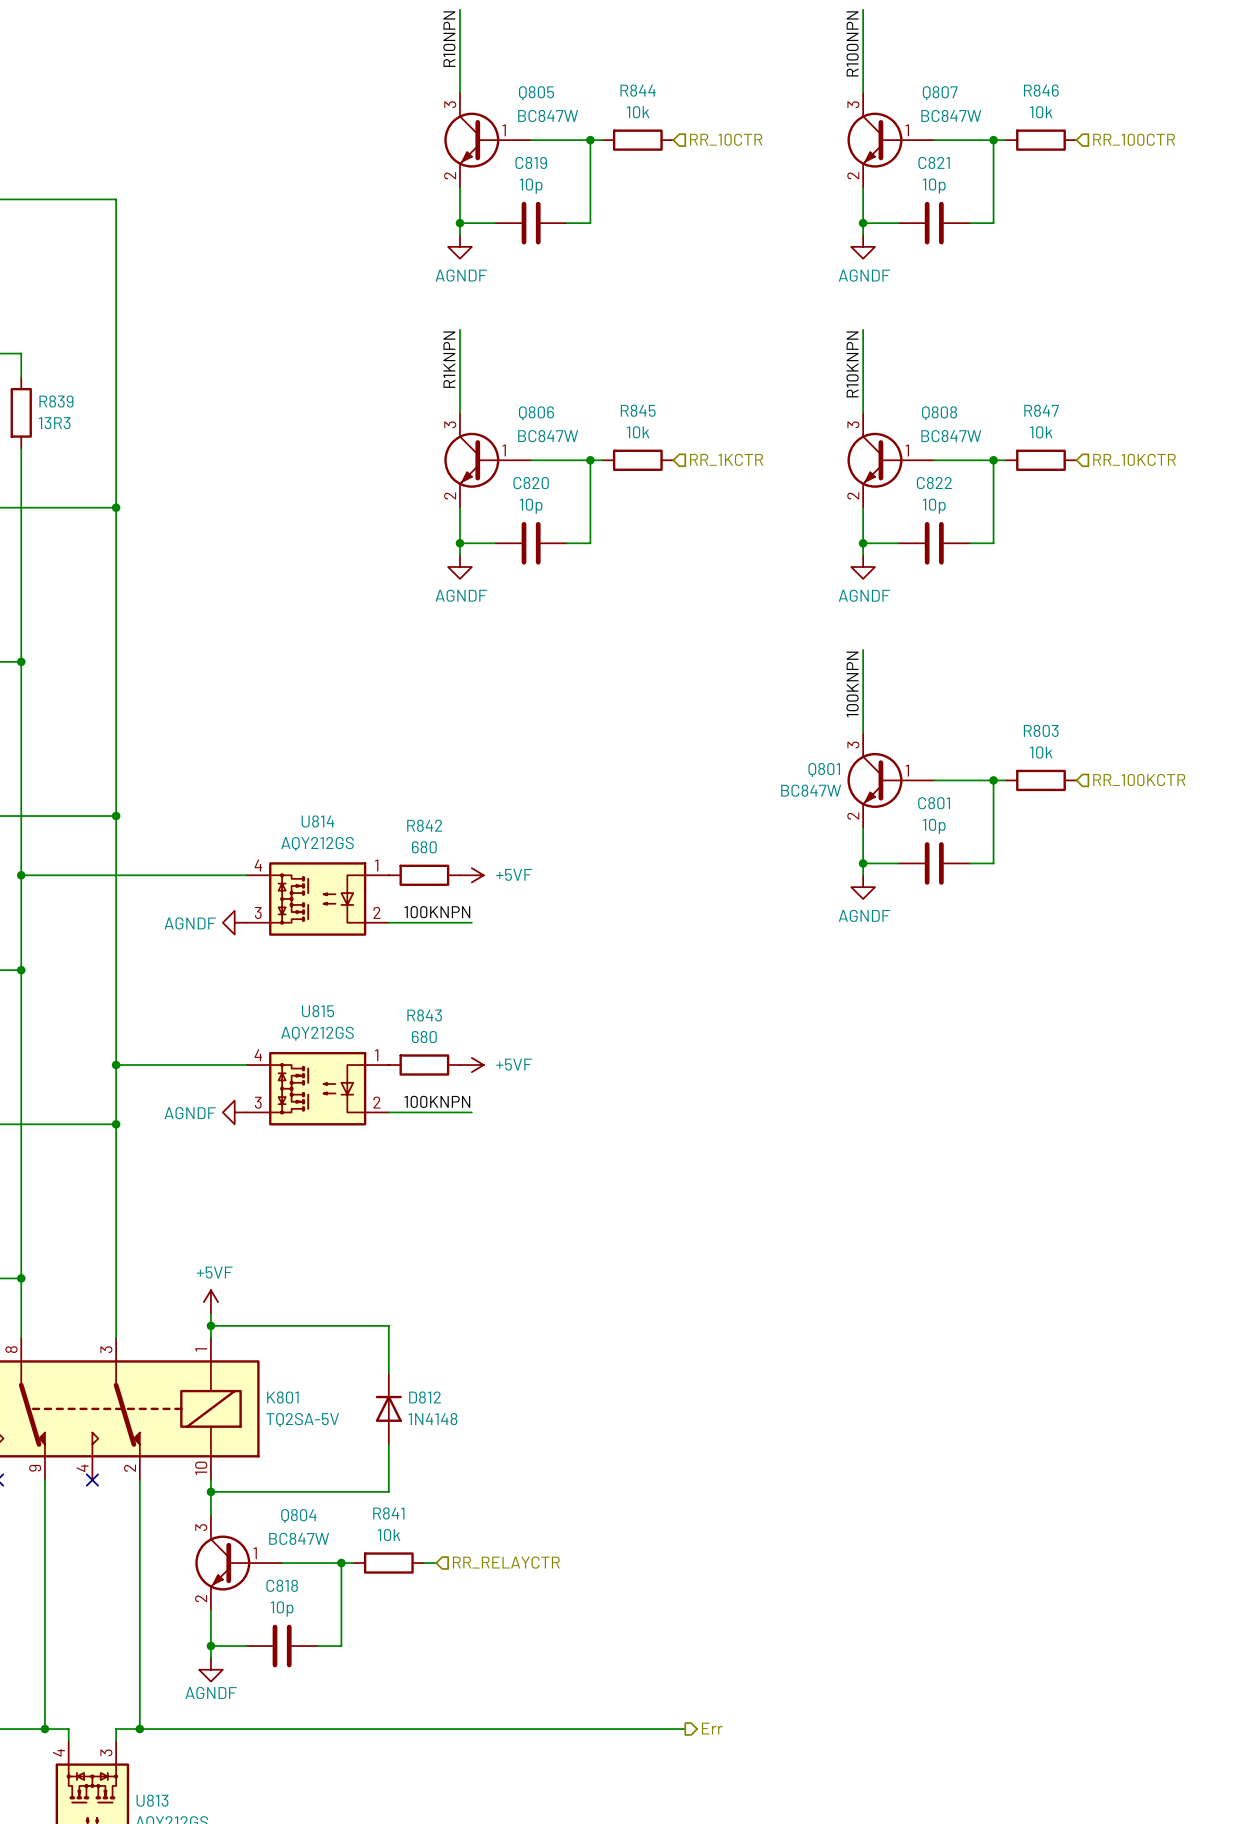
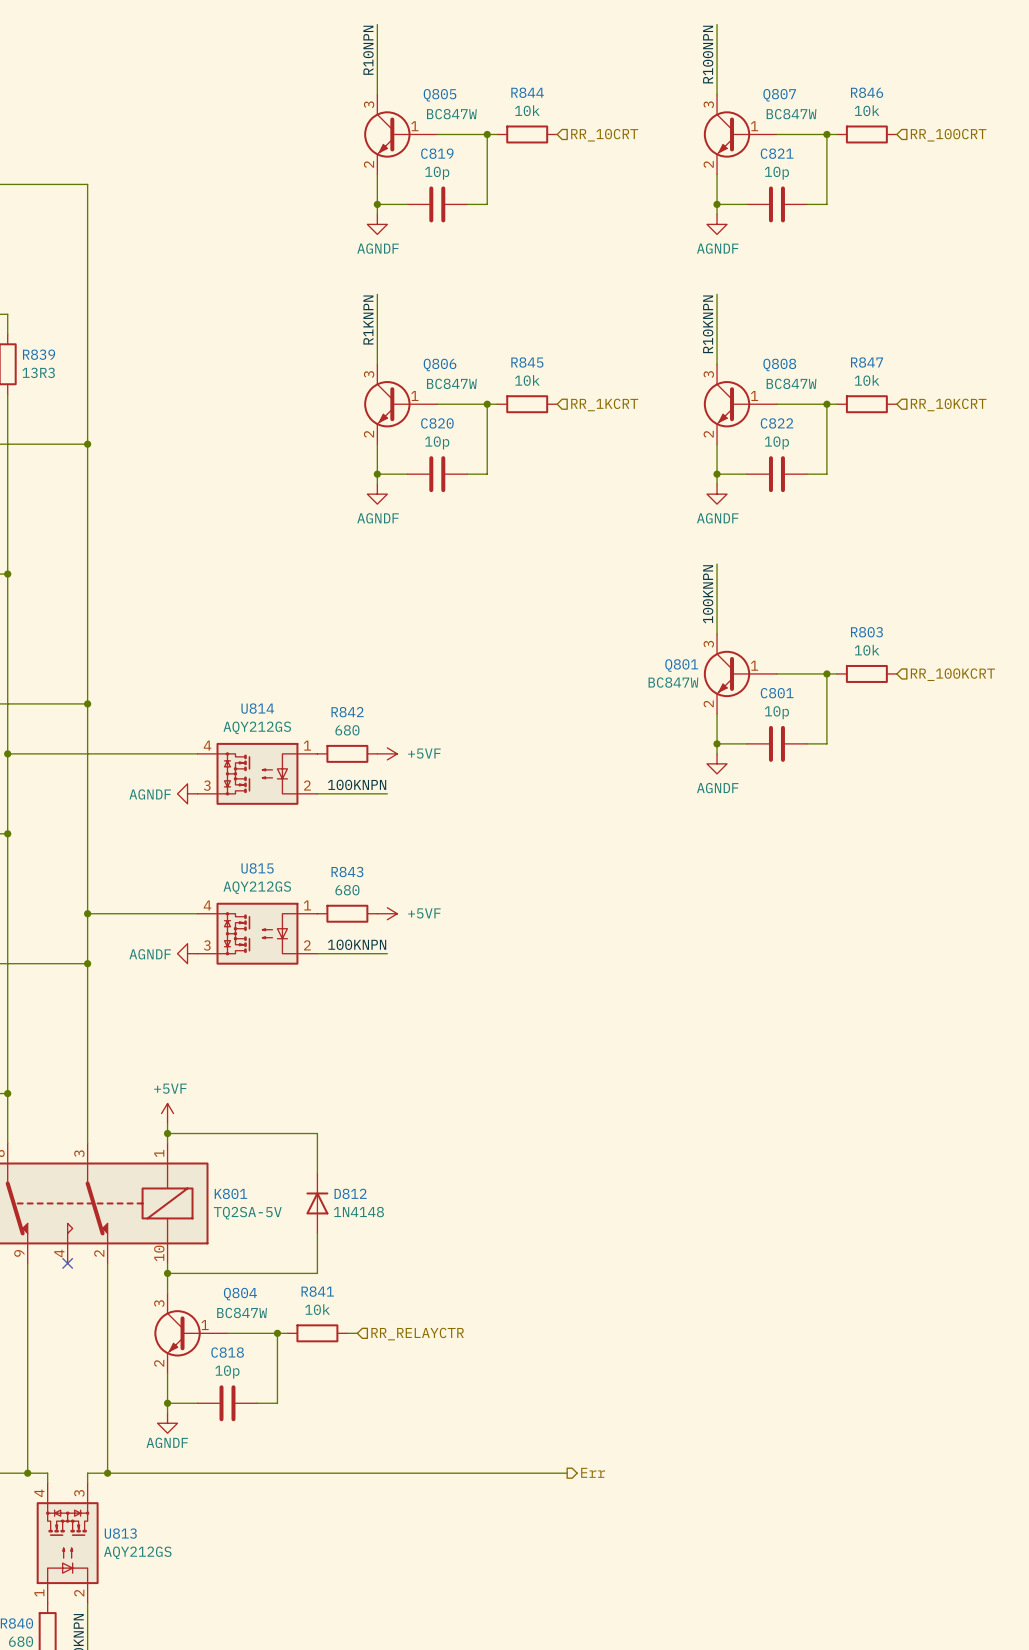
hierarchical label: RR_10CTR (726, 139) -> RR_10CRT (604, 135)
hierarchical label: RR_100CTR (1134, 139) -> RR_100CRT (948, 135)
hierarchical label: RR_1KCTR (726, 459) -> RR_1KCRT (604, 404)
hierarchical label: RR_10KCTR (1134, 459) -> RR_10KCRT (948, 404)
hierarchical label: RR_100KCTR (1139, 780) -> RR_100KCRT (952, 674)

